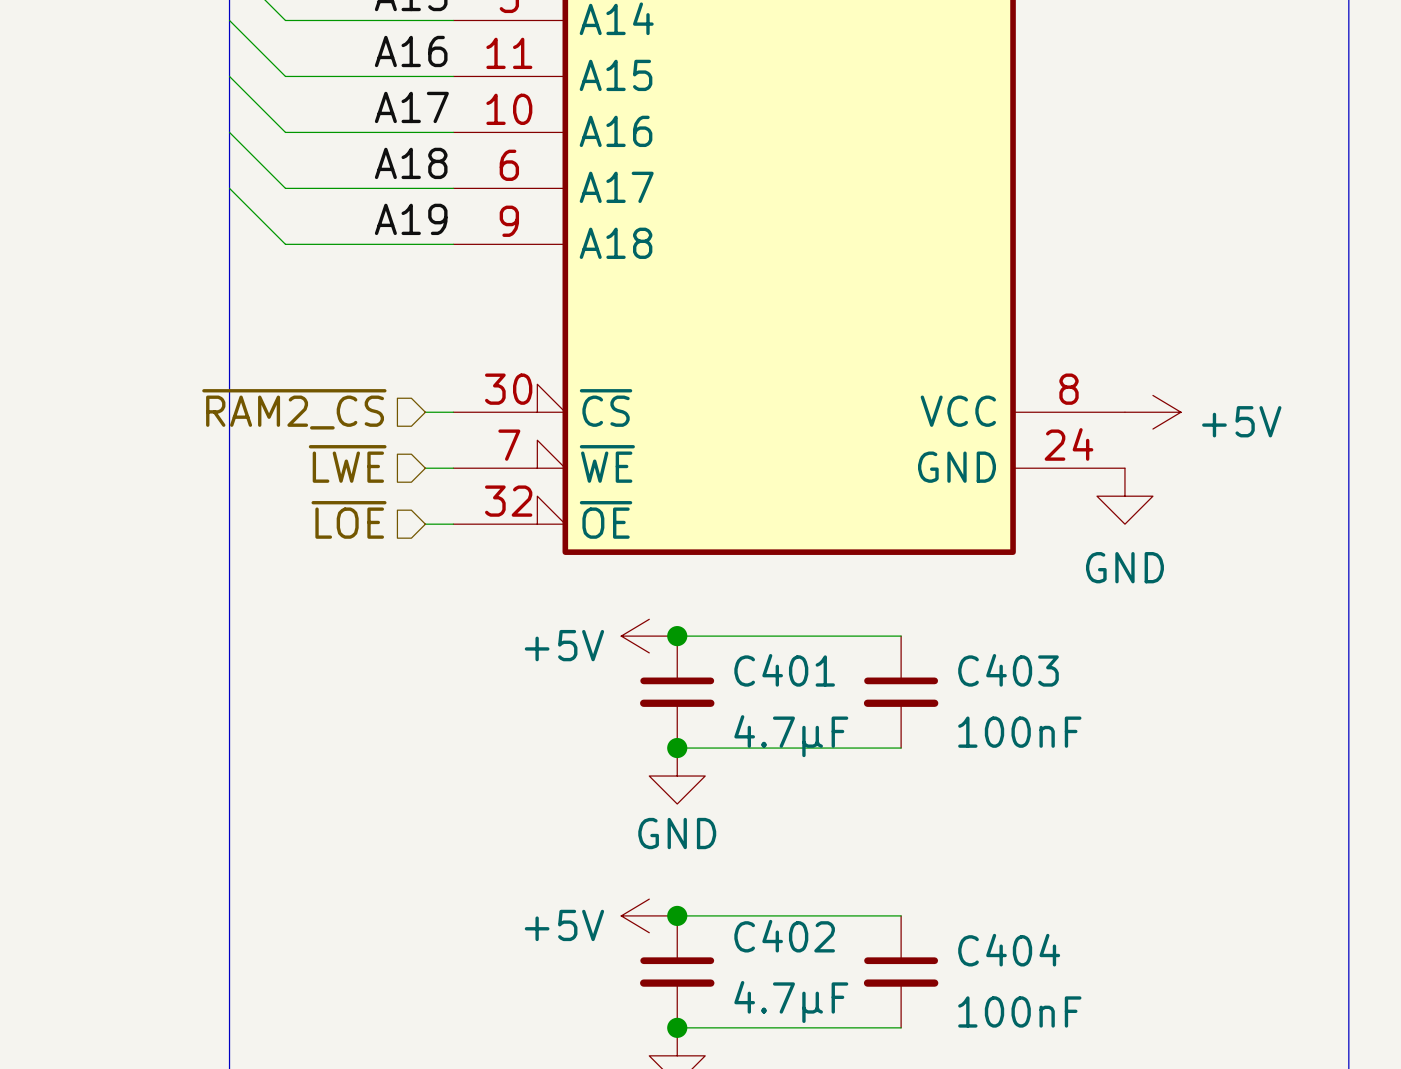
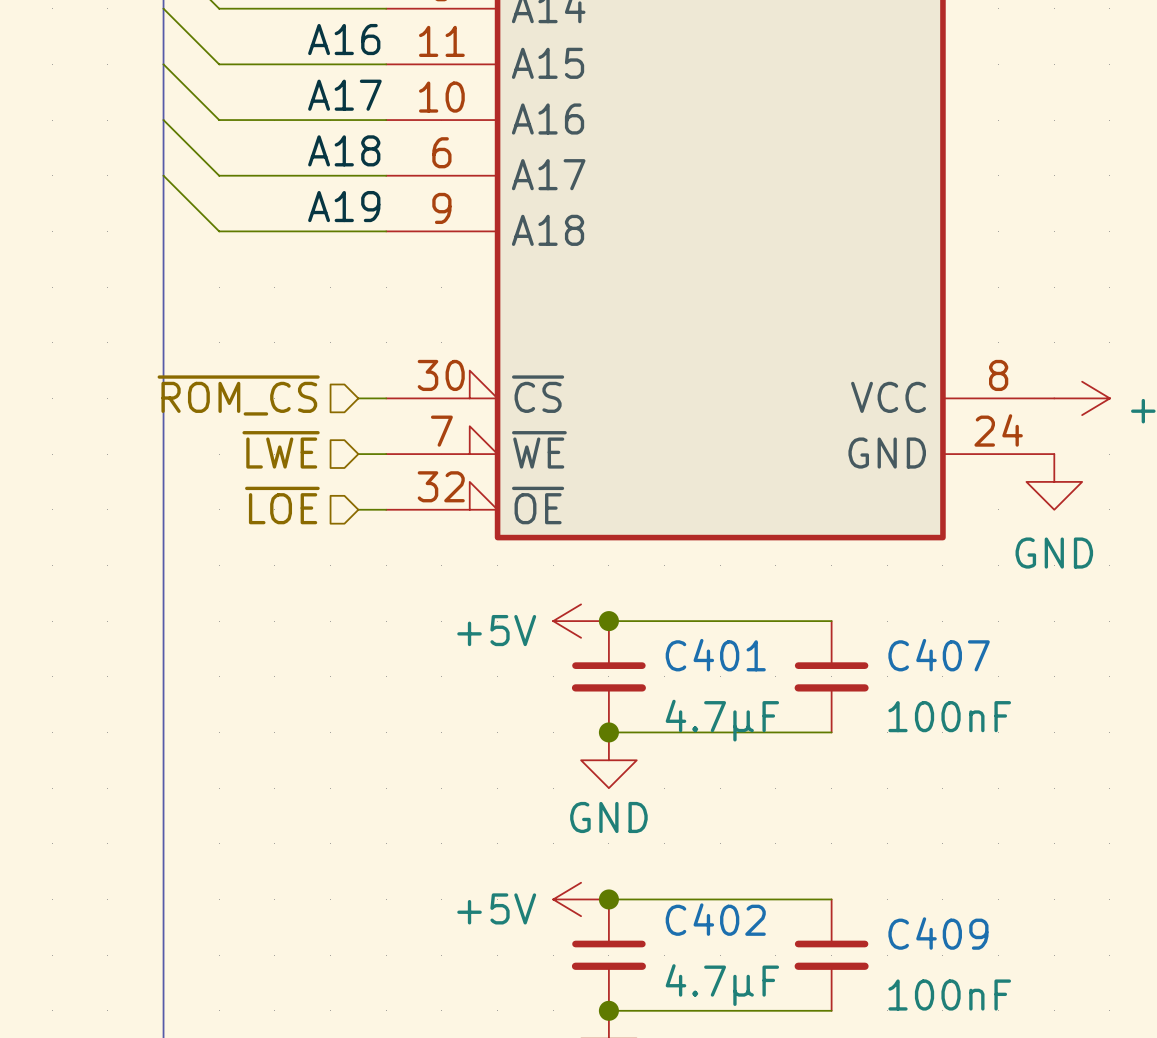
hierarchical label: ~{RAM2_CS} (294, 409) -> ~{ROM_CS} (238, 395)
C403 name: C403 (1008, 670) -> C407 (939, 655)
C404 name: C404 (1009, 950) -> C409 (938, 933)

